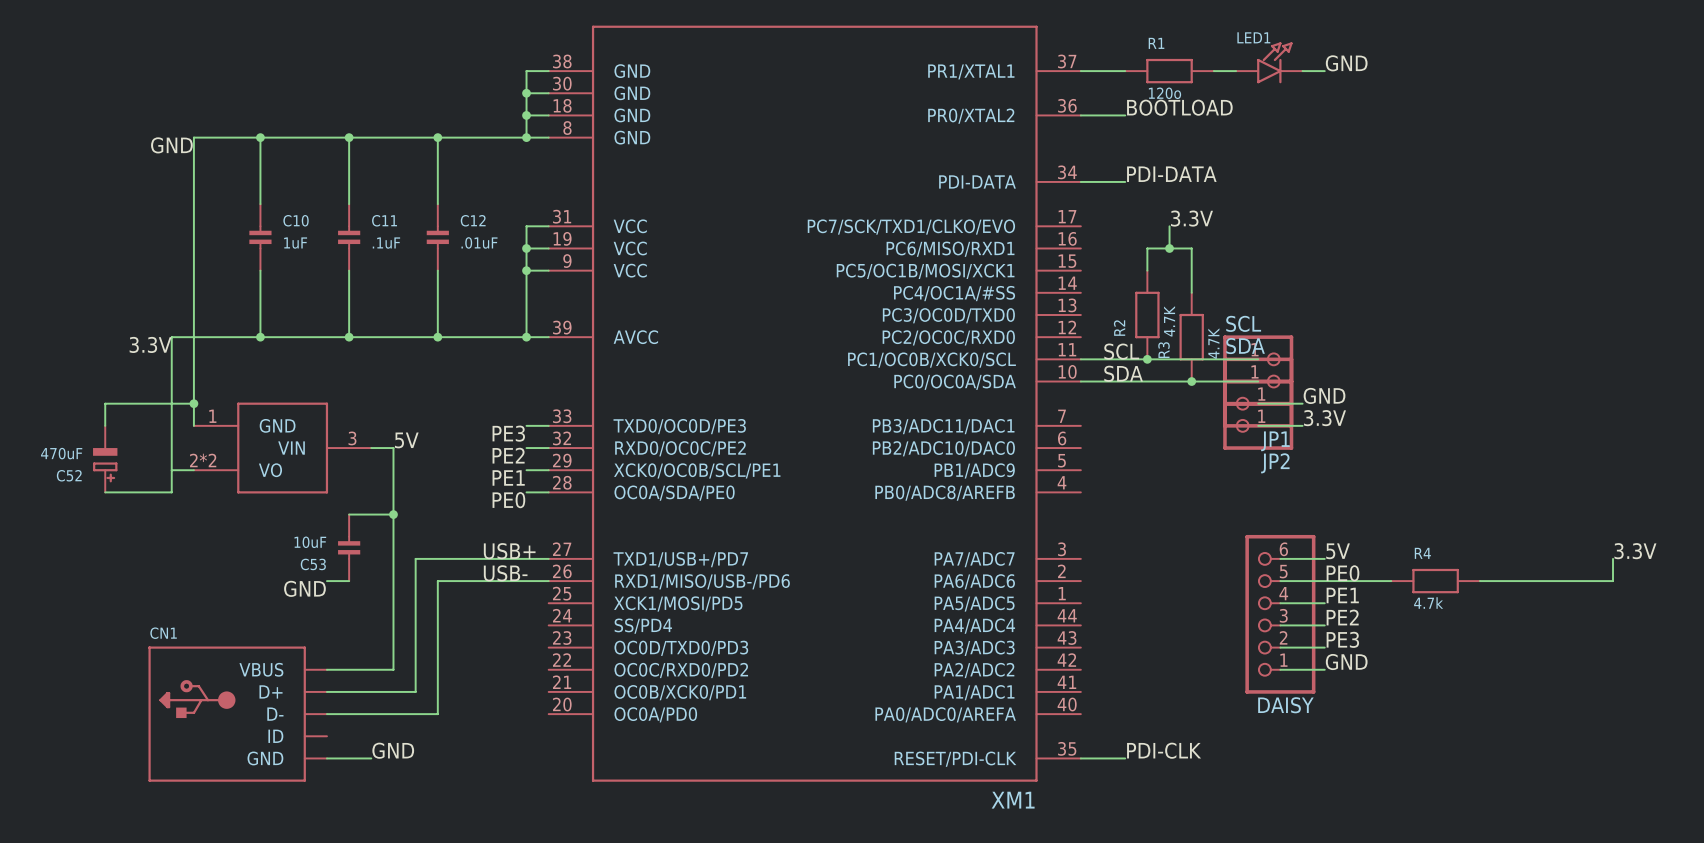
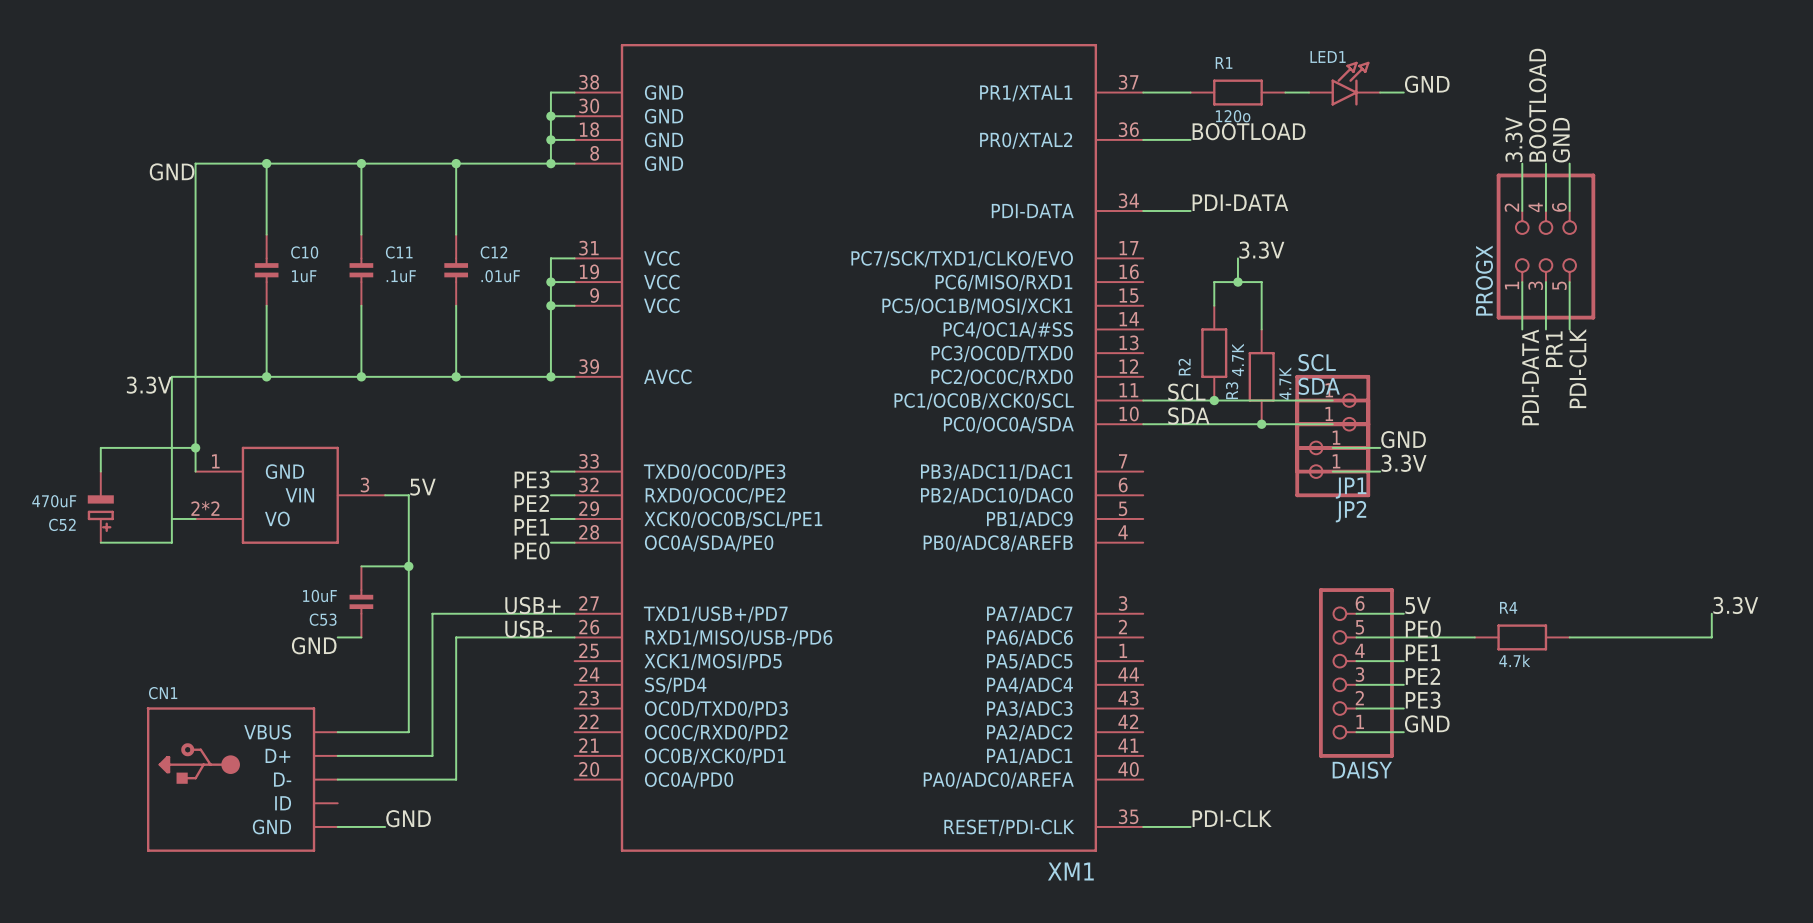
label: none -> BOOTLOAD (1537, 105)
label: none -> 3.3V (1513, 139)
label: none -> GND (1561, 140)
wire: none -> (1522, 163) (1522, 211)
wire: none -> (1545, 163) (1545, 211)
wire: none -> (1569, 163) (1569, 211)
PROGX: none -> (1545, 246)
wire: none -> (1522, 282) (1522, 329)
wire: none -> (1545, 282) (1545, 329)
wire: none -> (1569, 282) (1569, 329)
label: none -> PR1 (1554, 349)
label: none -> PDI-CLK (1577, 368)
label: none -> PDI-DATA (1530, 377)

